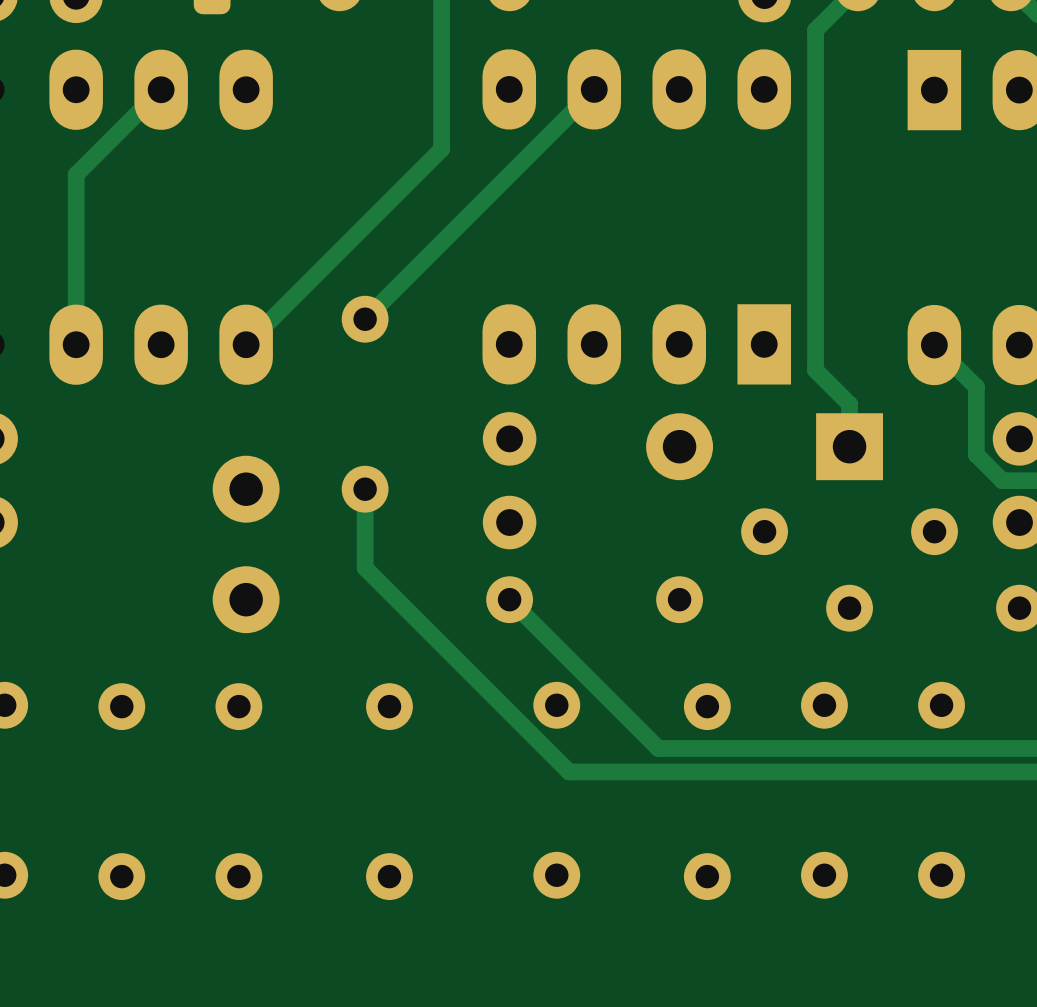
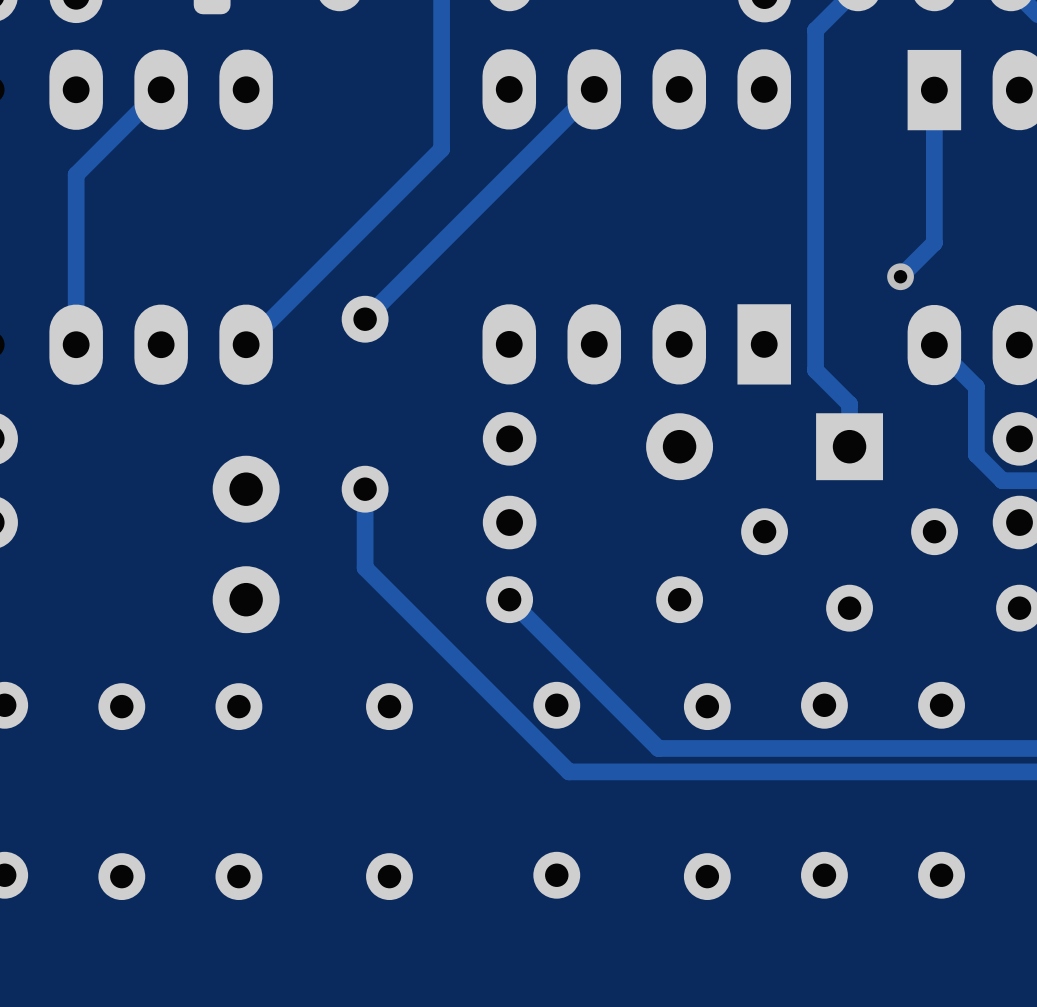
track: none -> (934, 90) (934, 242) (900, 276)
via: none -> (900, 276)

